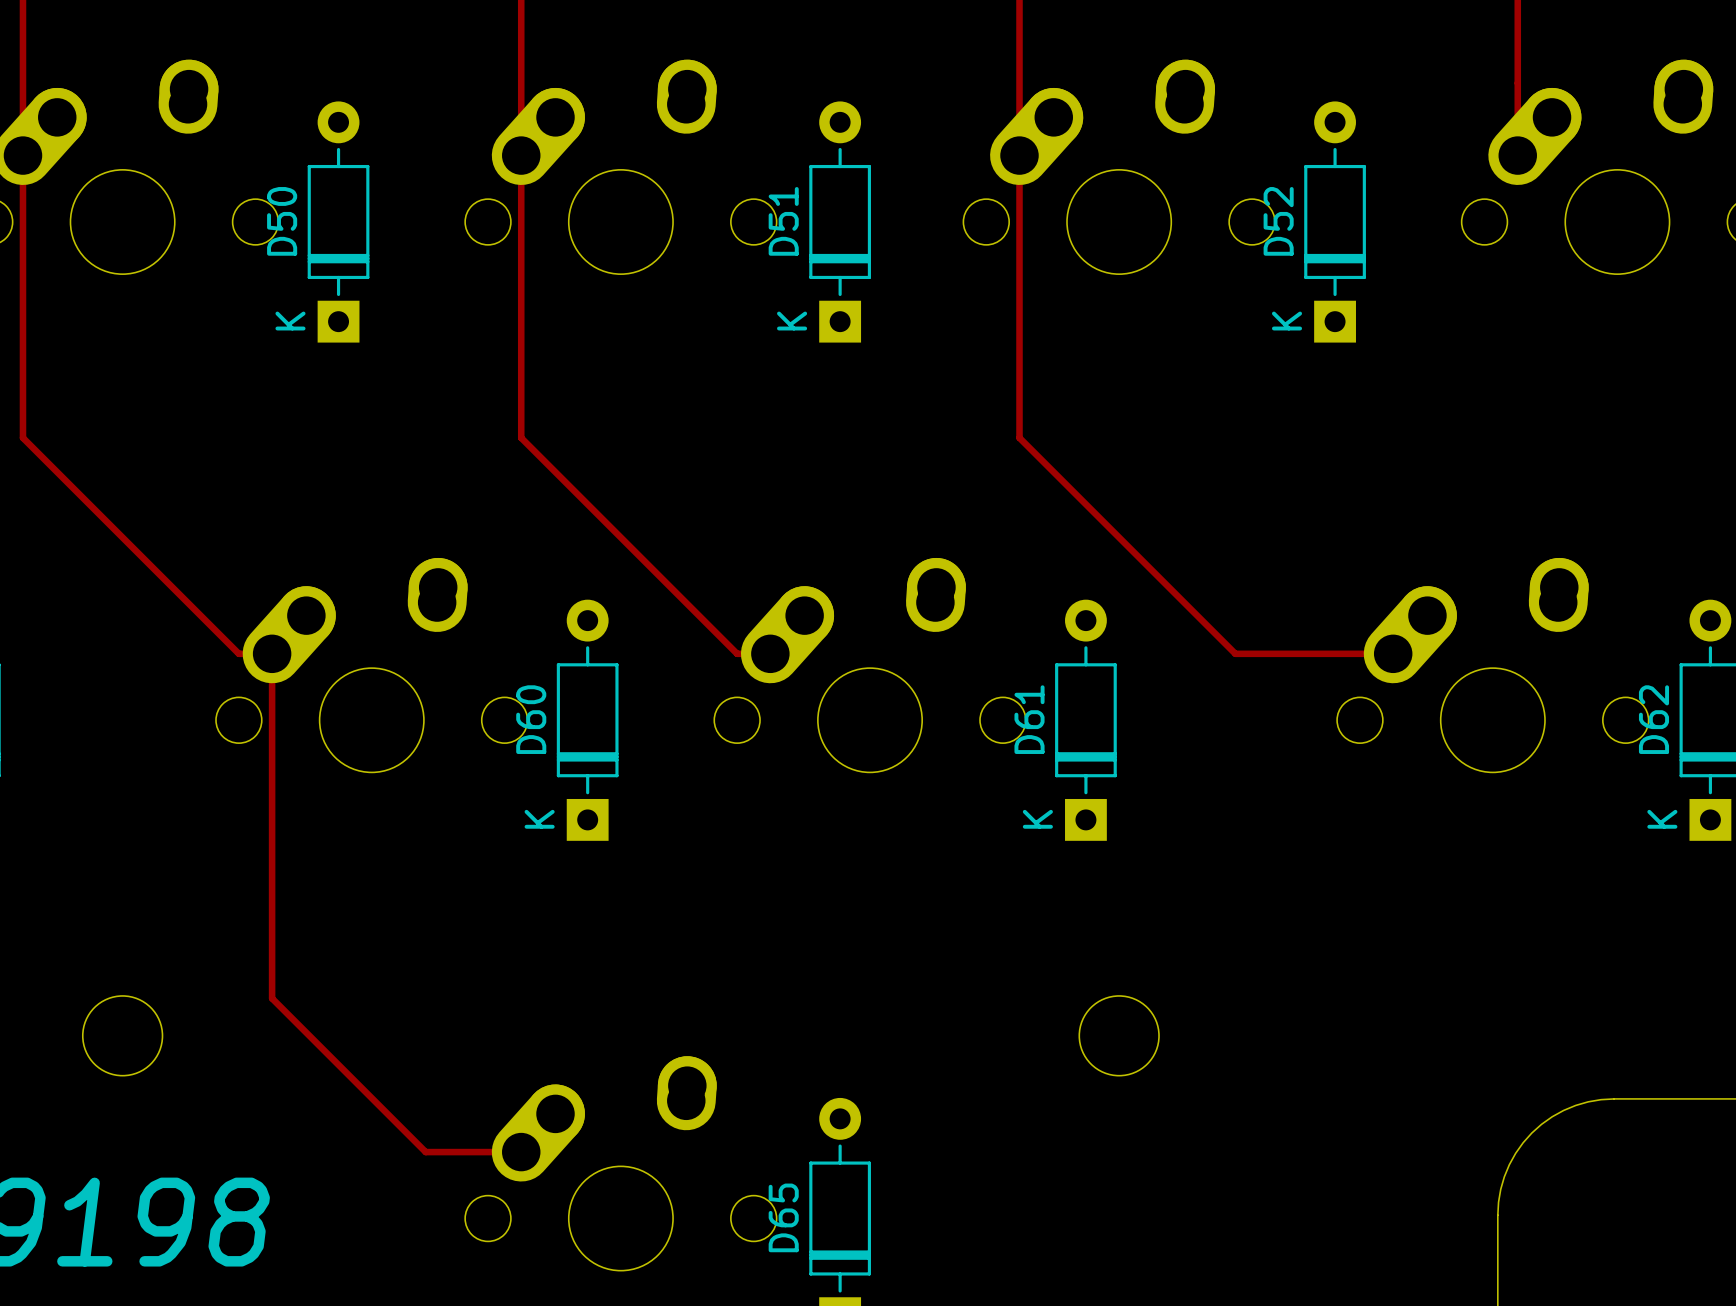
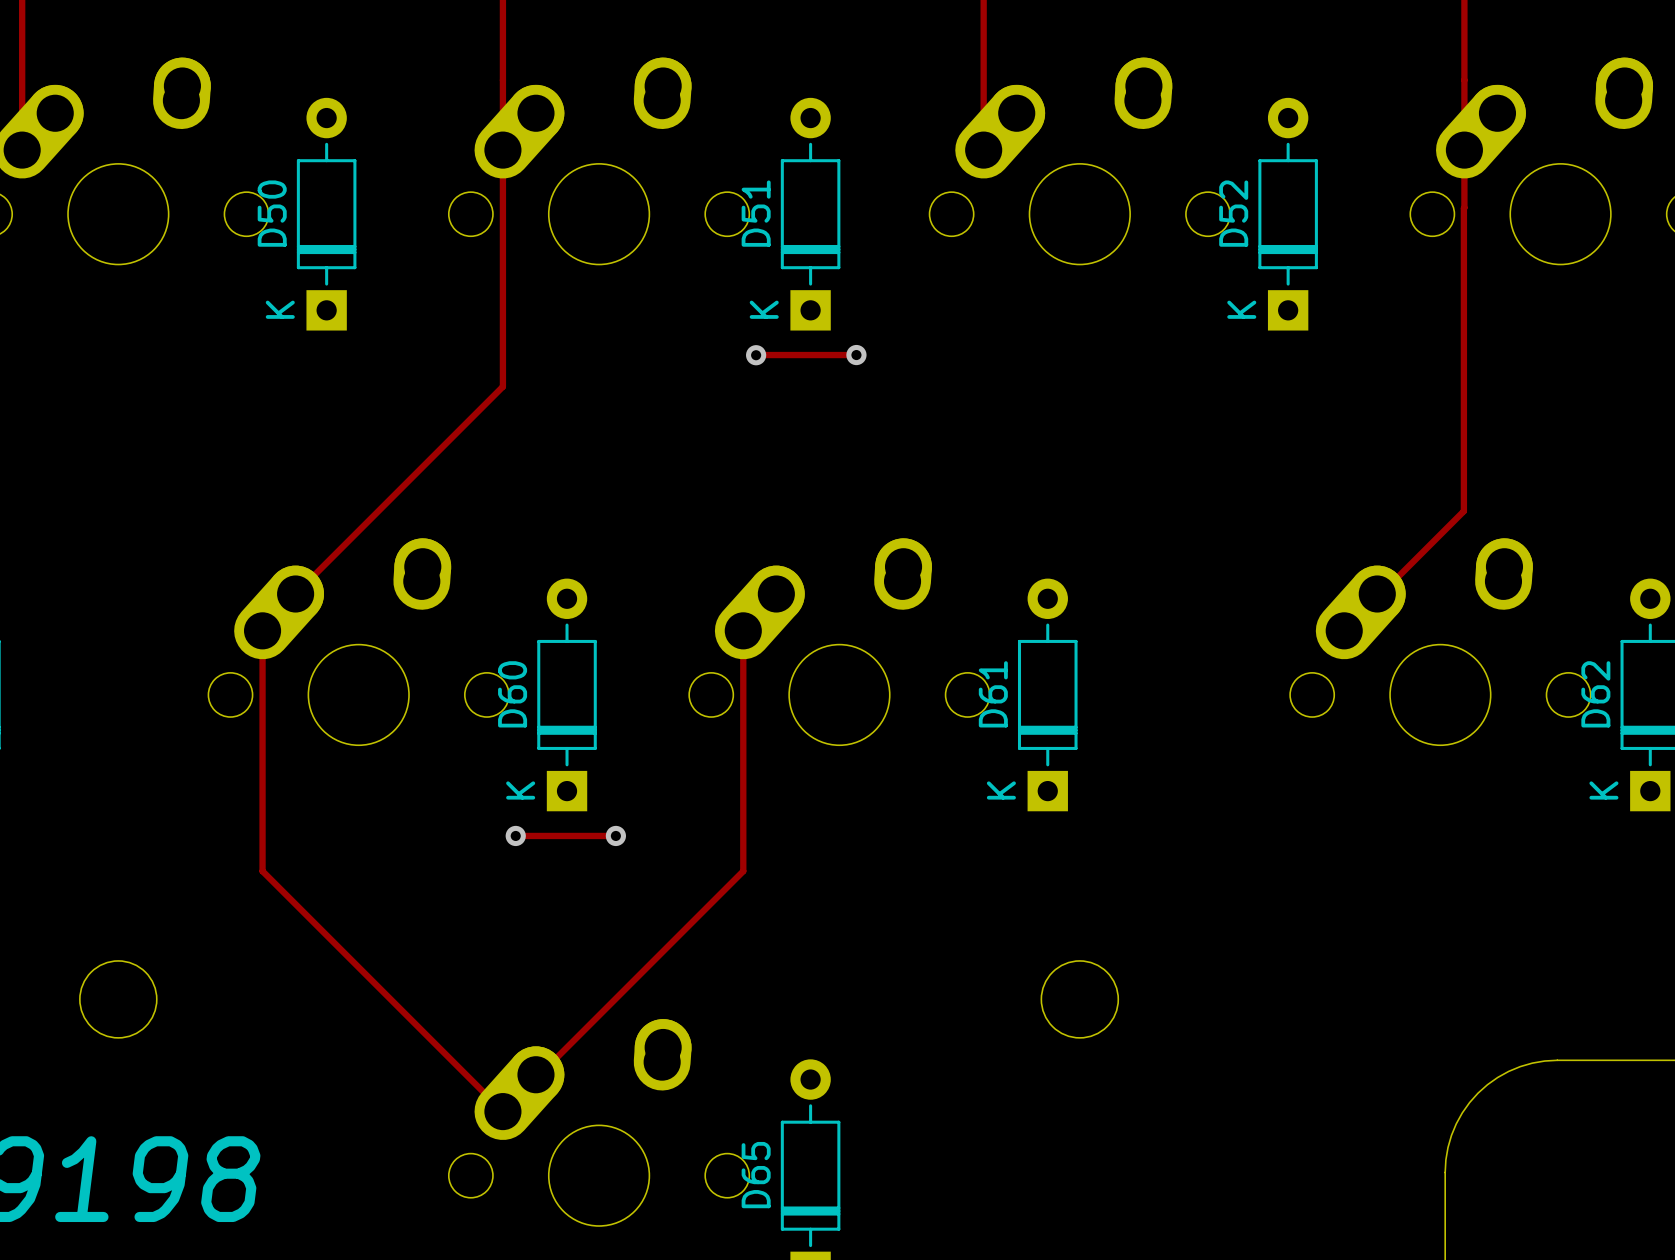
track: (22, 155) (22, 437) (238, 653) (272, 653) -> none
track: (1019, 155) (1019, 437) (1235, 653) (1393, 653) -> (1464, 150) (1463, 511) (1344, 630)
track: none -> (756, 355) (856, 355)
via: none -> (856, 355)
via: none -> (756, 355)
track: (521, 400) (521, 437) (737, 653) (770, 653) -> (502, 386) (262, 627) (262, 630)
track: none -> (515, 835) (615, 835)
via: none -> (515, 835)
via: none -> (615, 835)
track: (272, 902) (272, 998) (425, 1152) (521, 1152) -> (262, 871) (502, 1111) (743, 871) (743, 630)

